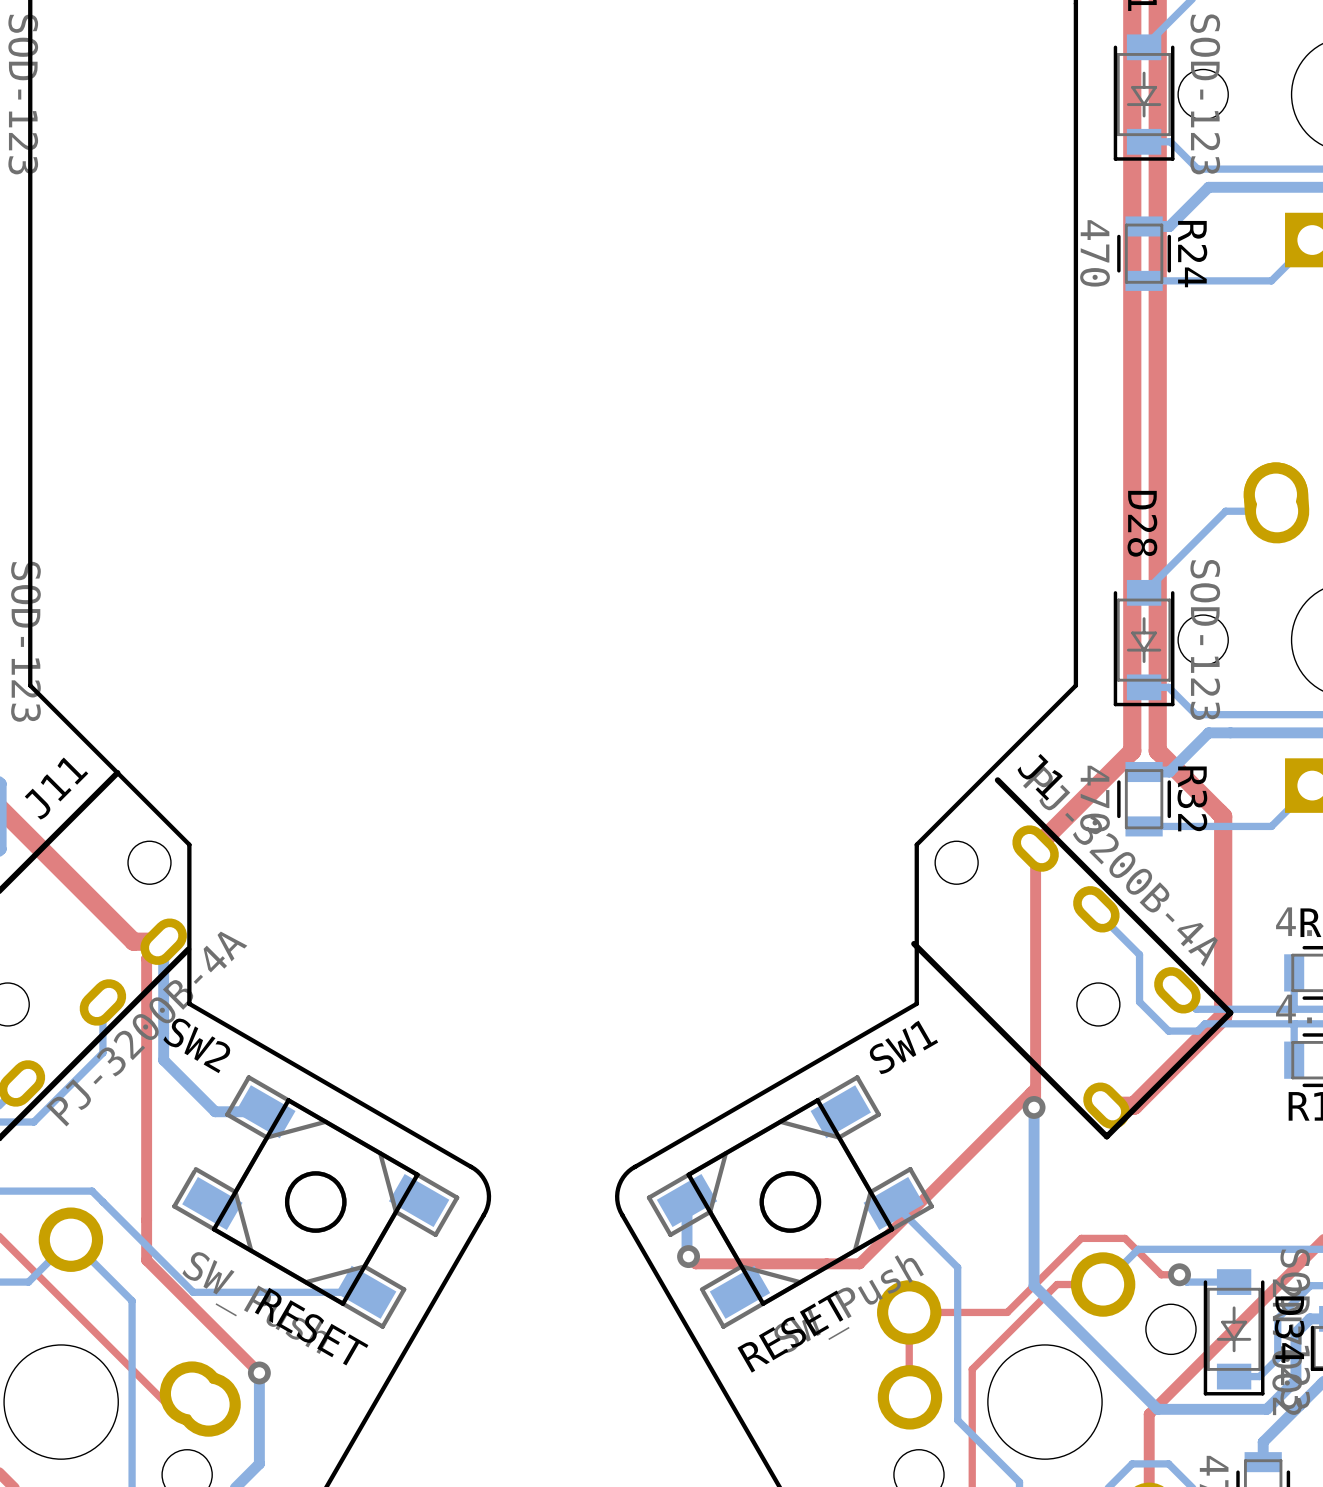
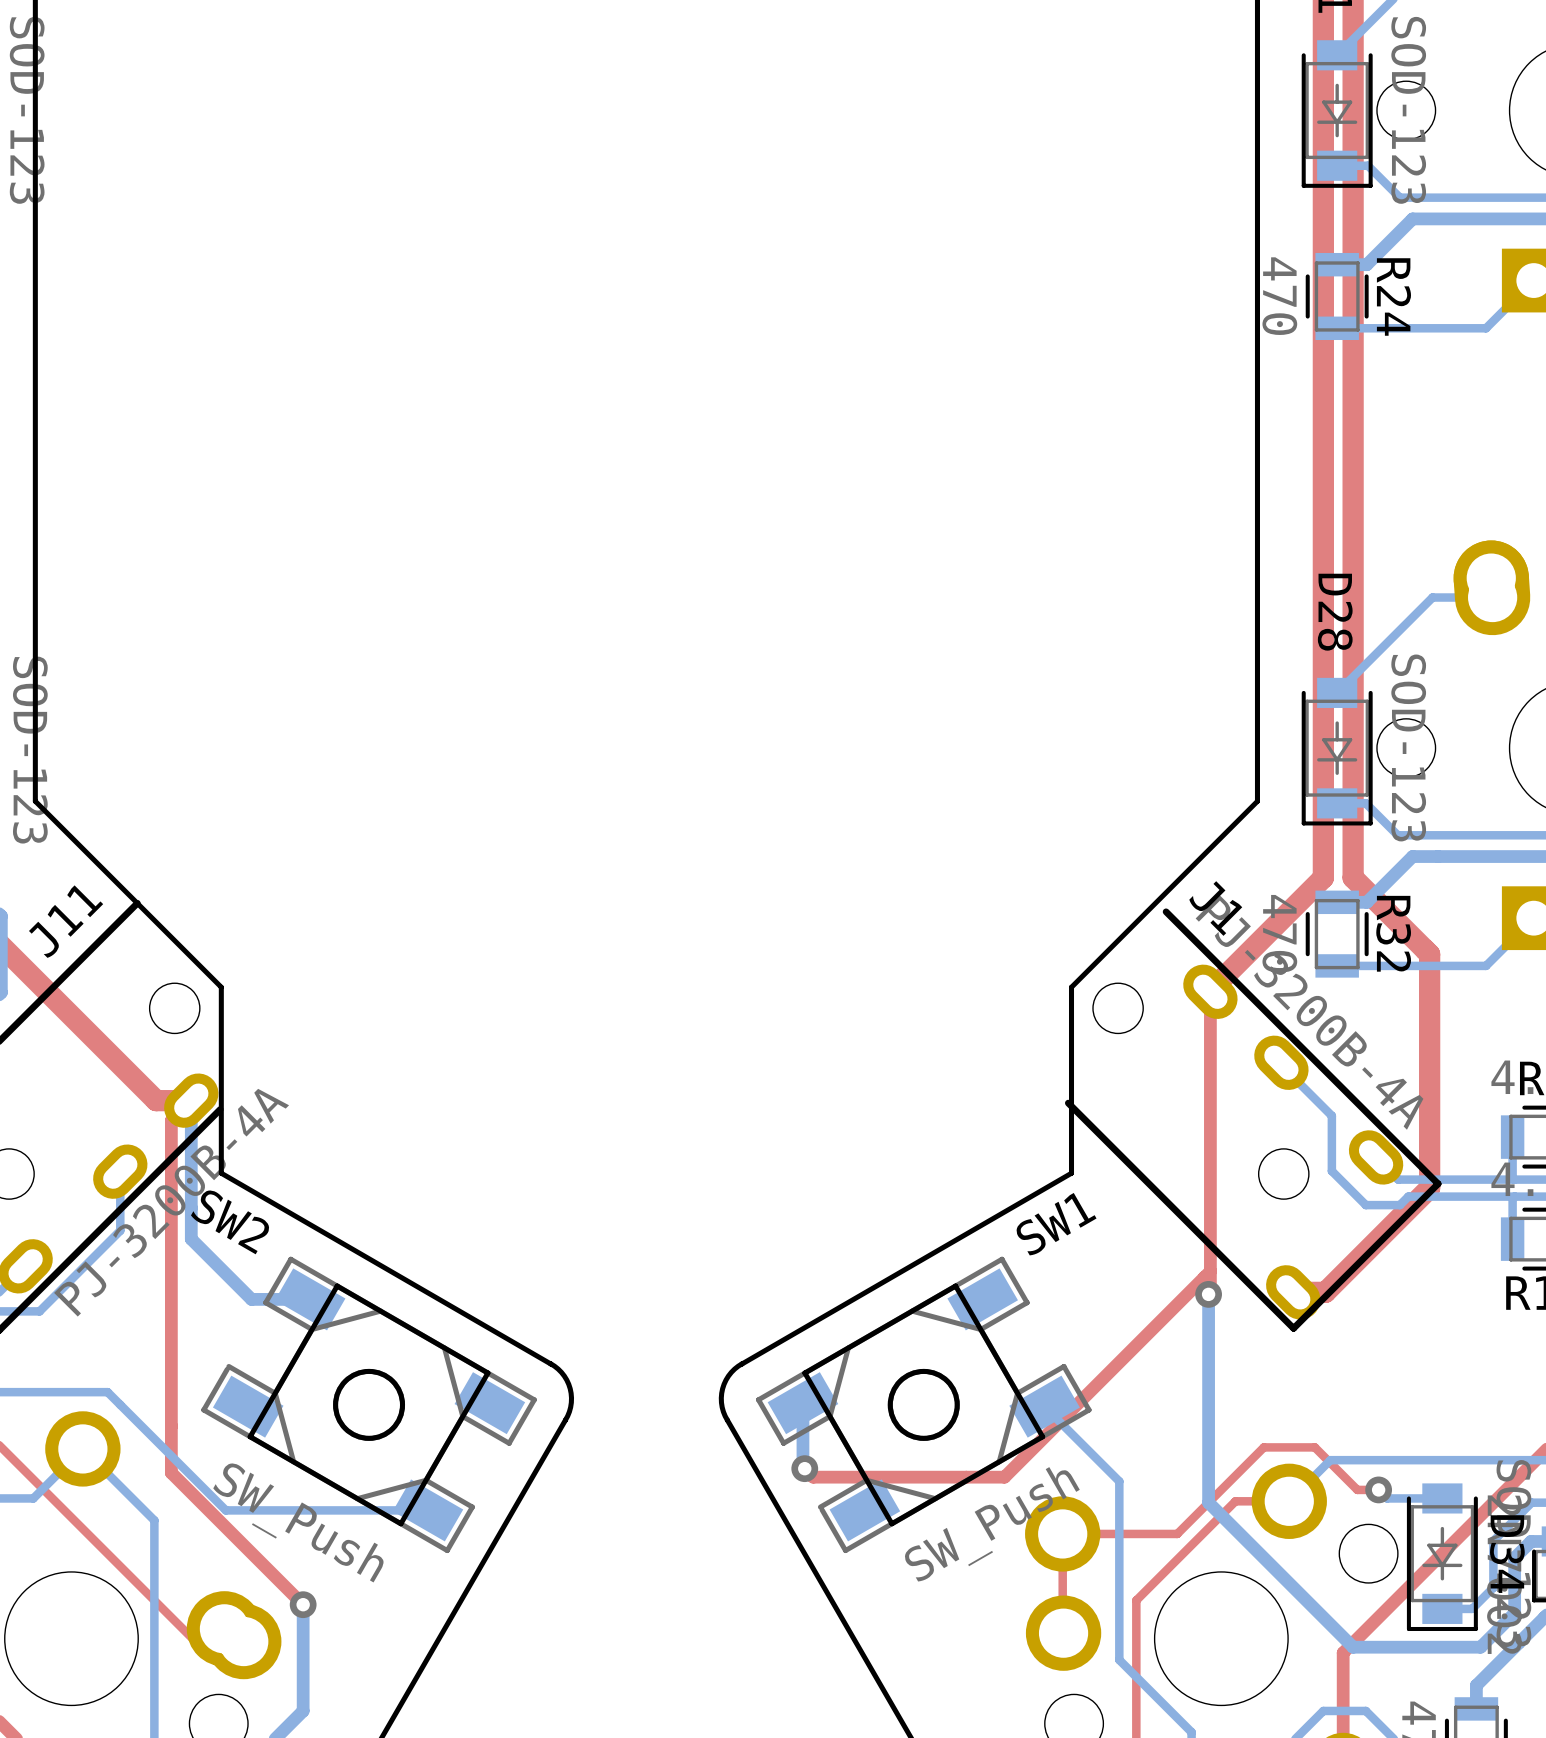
text: RESET (311, 1326) -> none
text: RESET (790, 1331) -> none

